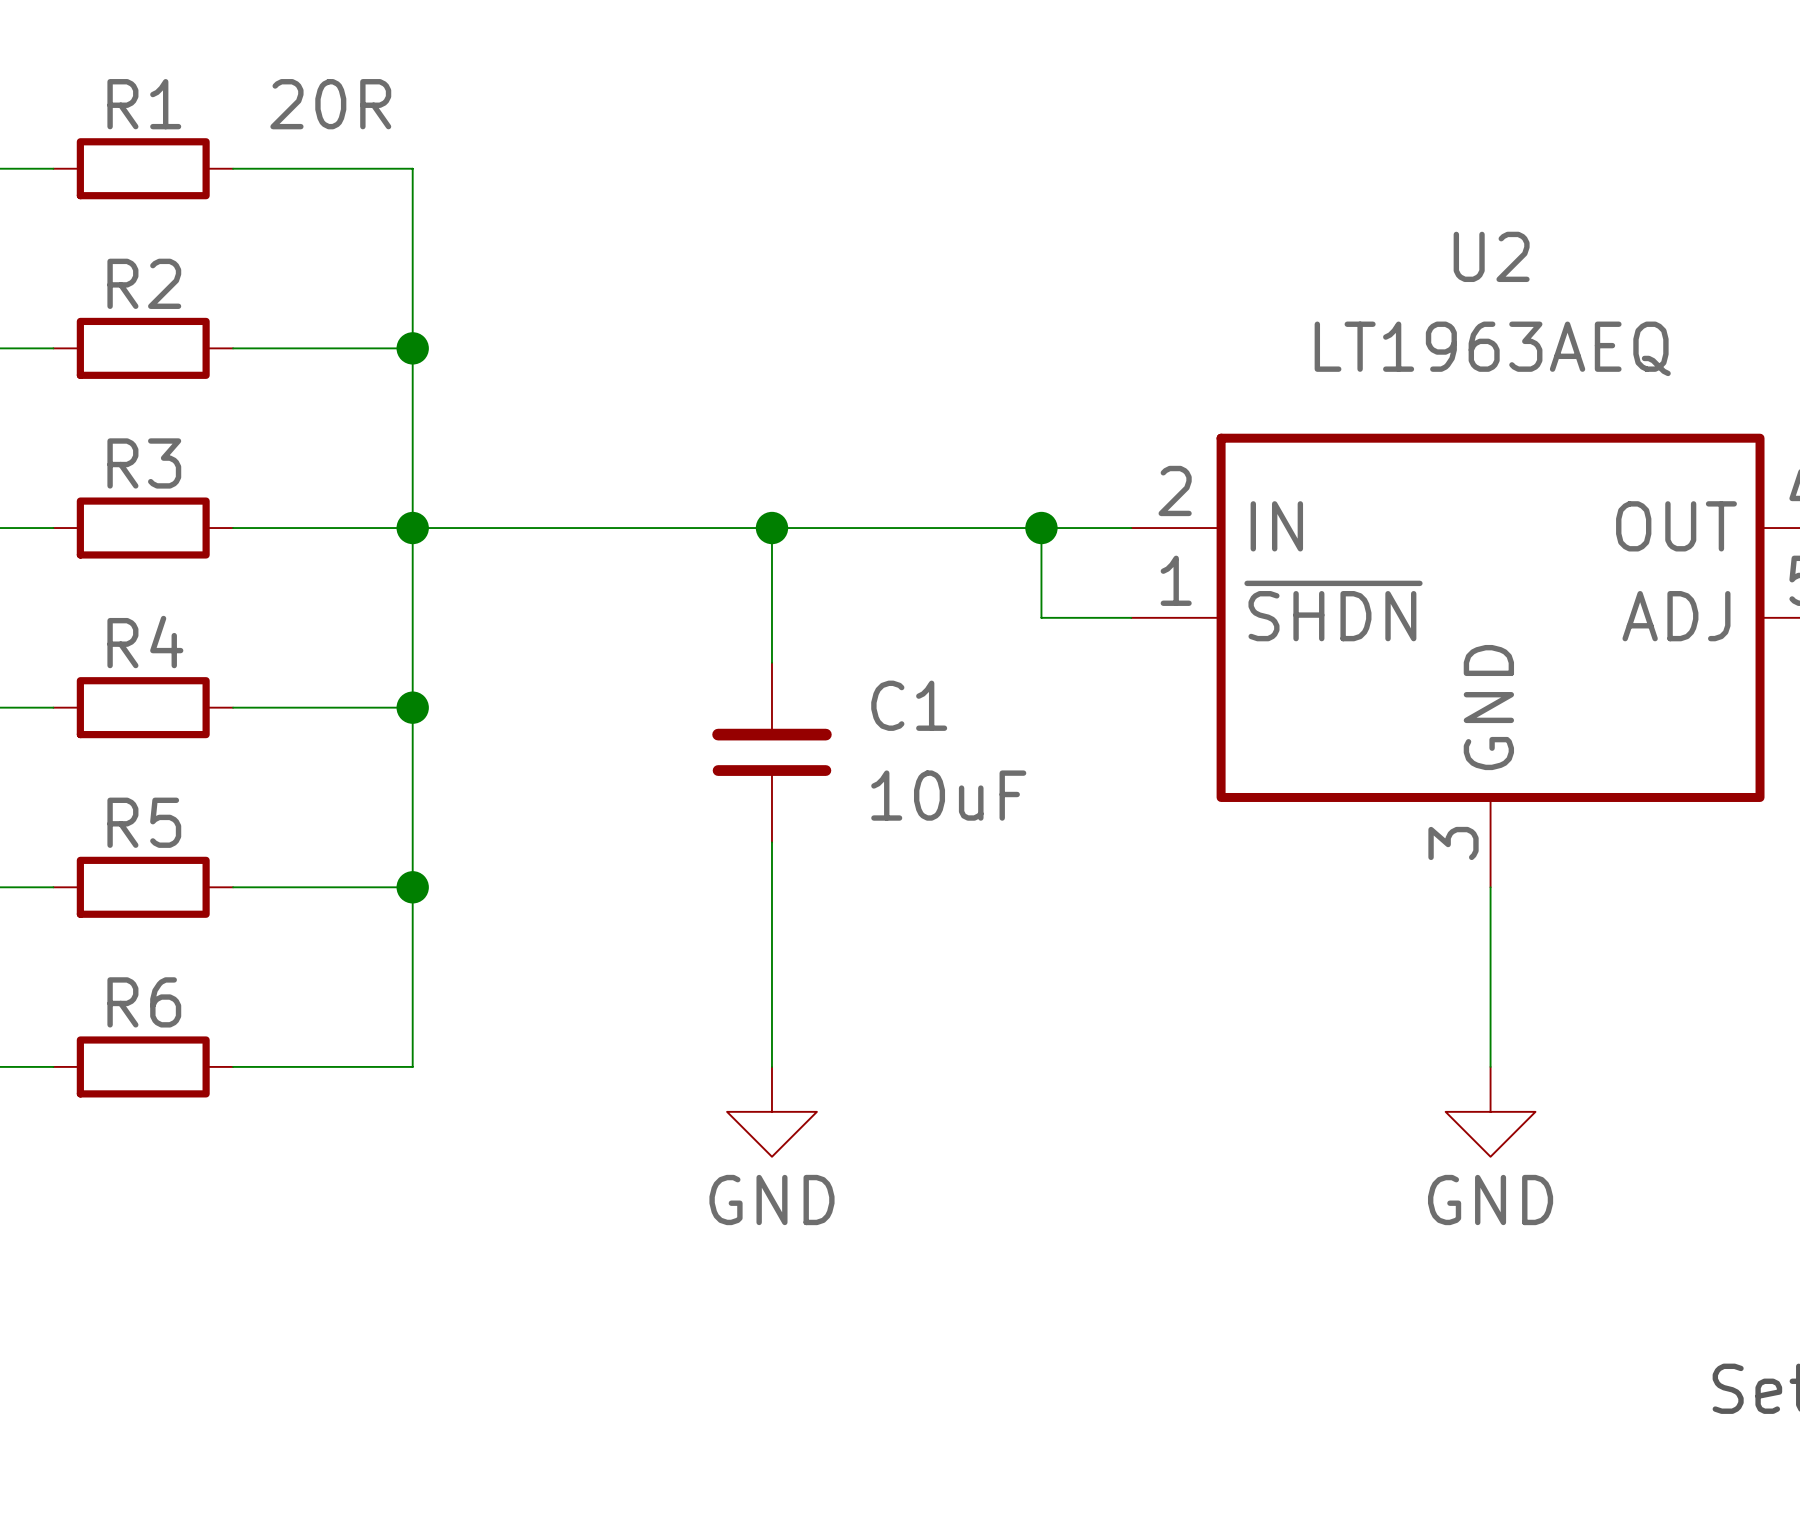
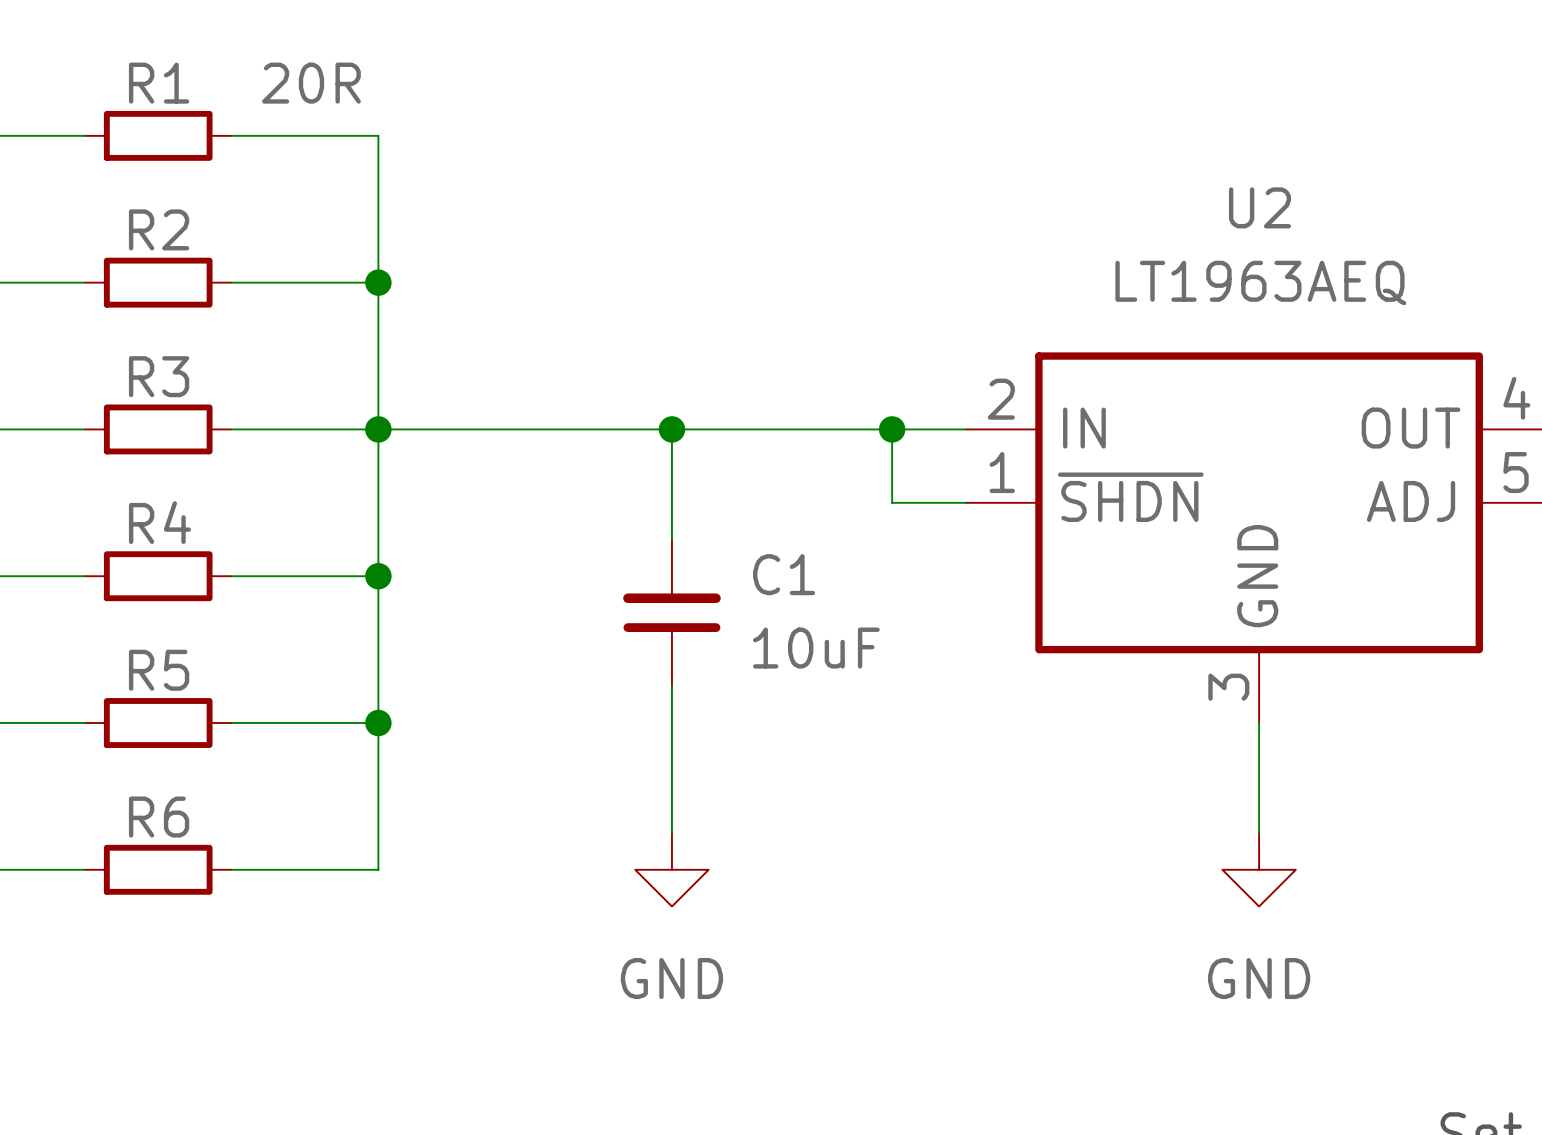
power symbol position: GND (771, 1111) -> GND (671, 869)
power symbol position: GND (1490, 1111) -> GND (1259, 869)

